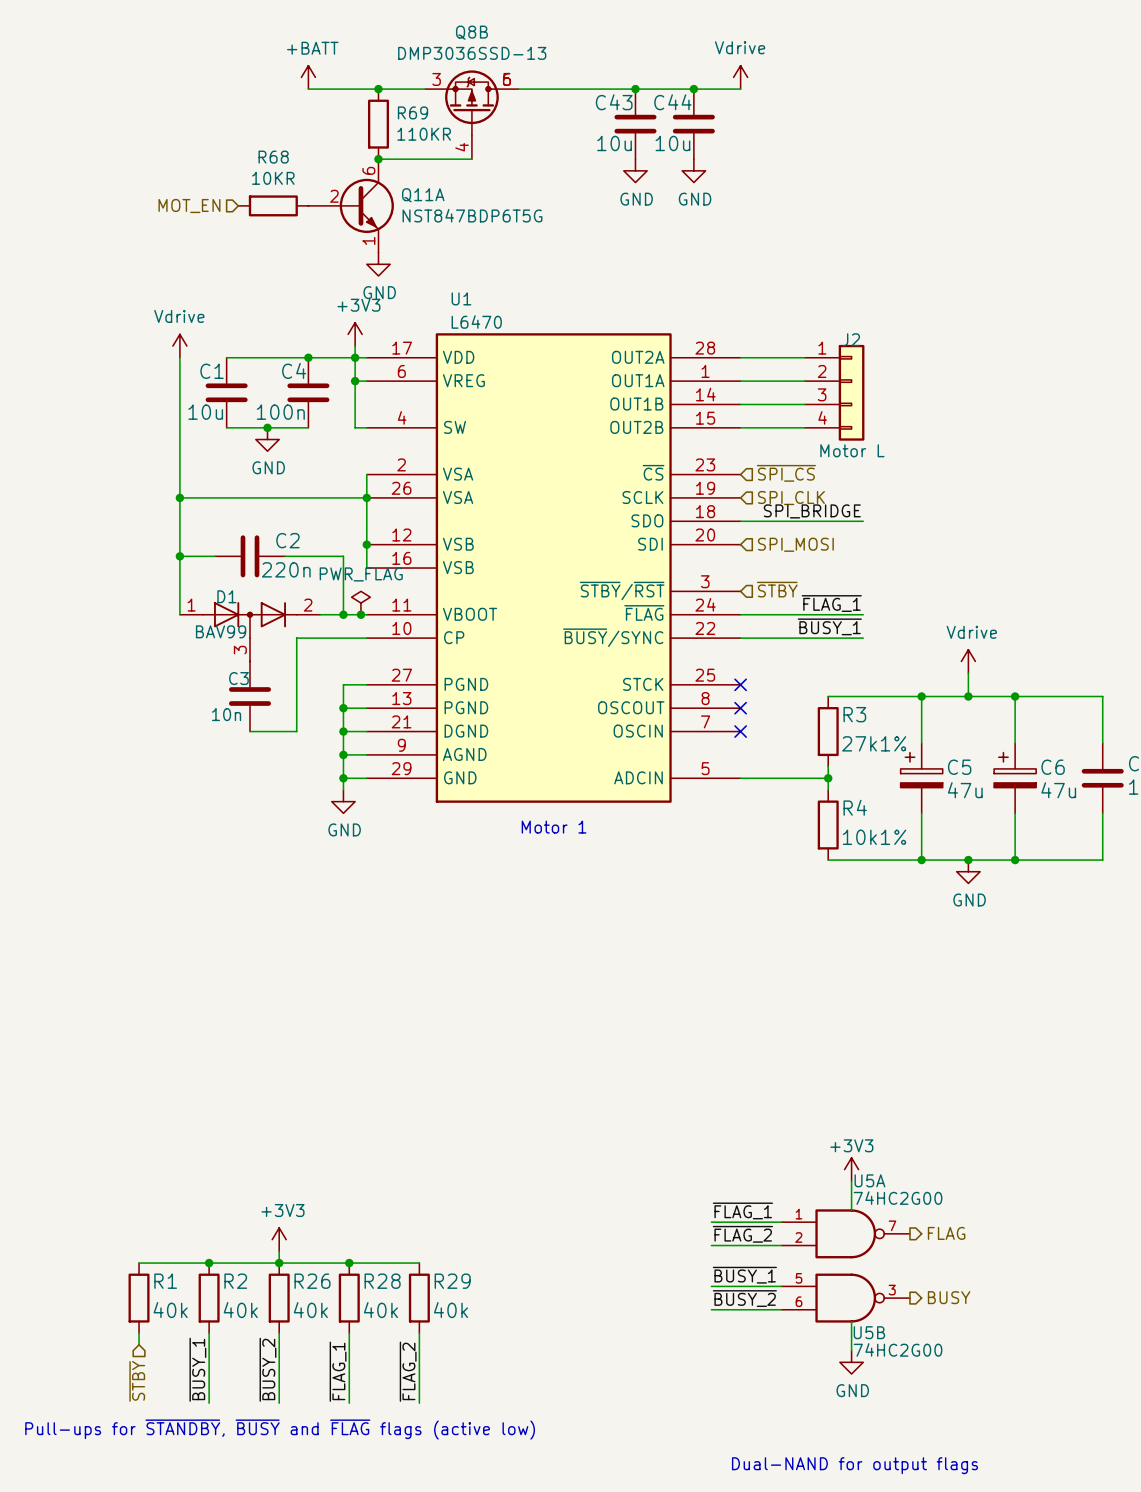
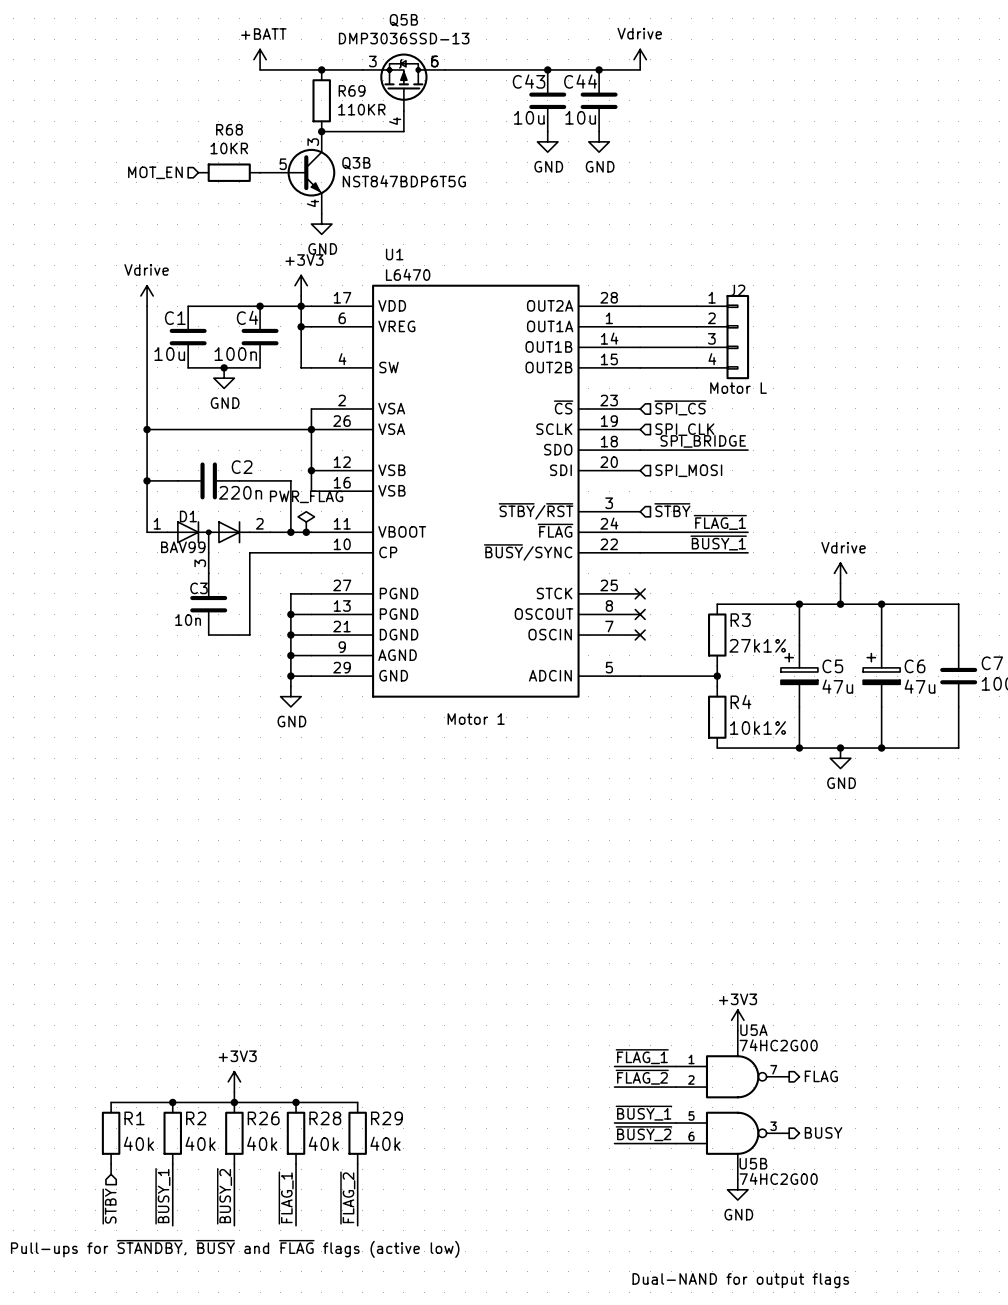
Q8B name: Q8B (471, 32) -> Q5B (403, 20)
Q11A pin number: 6 (368, 170) -> 3 (313, 142)
Q11A name: Q11A (423, 195) -> Q3B (356, 163)
Q11A pin number: 2 (334, 196) -> 5 (283, 164)
Q11A pin number: 1 (368, 240) -> 4 (312, 203)

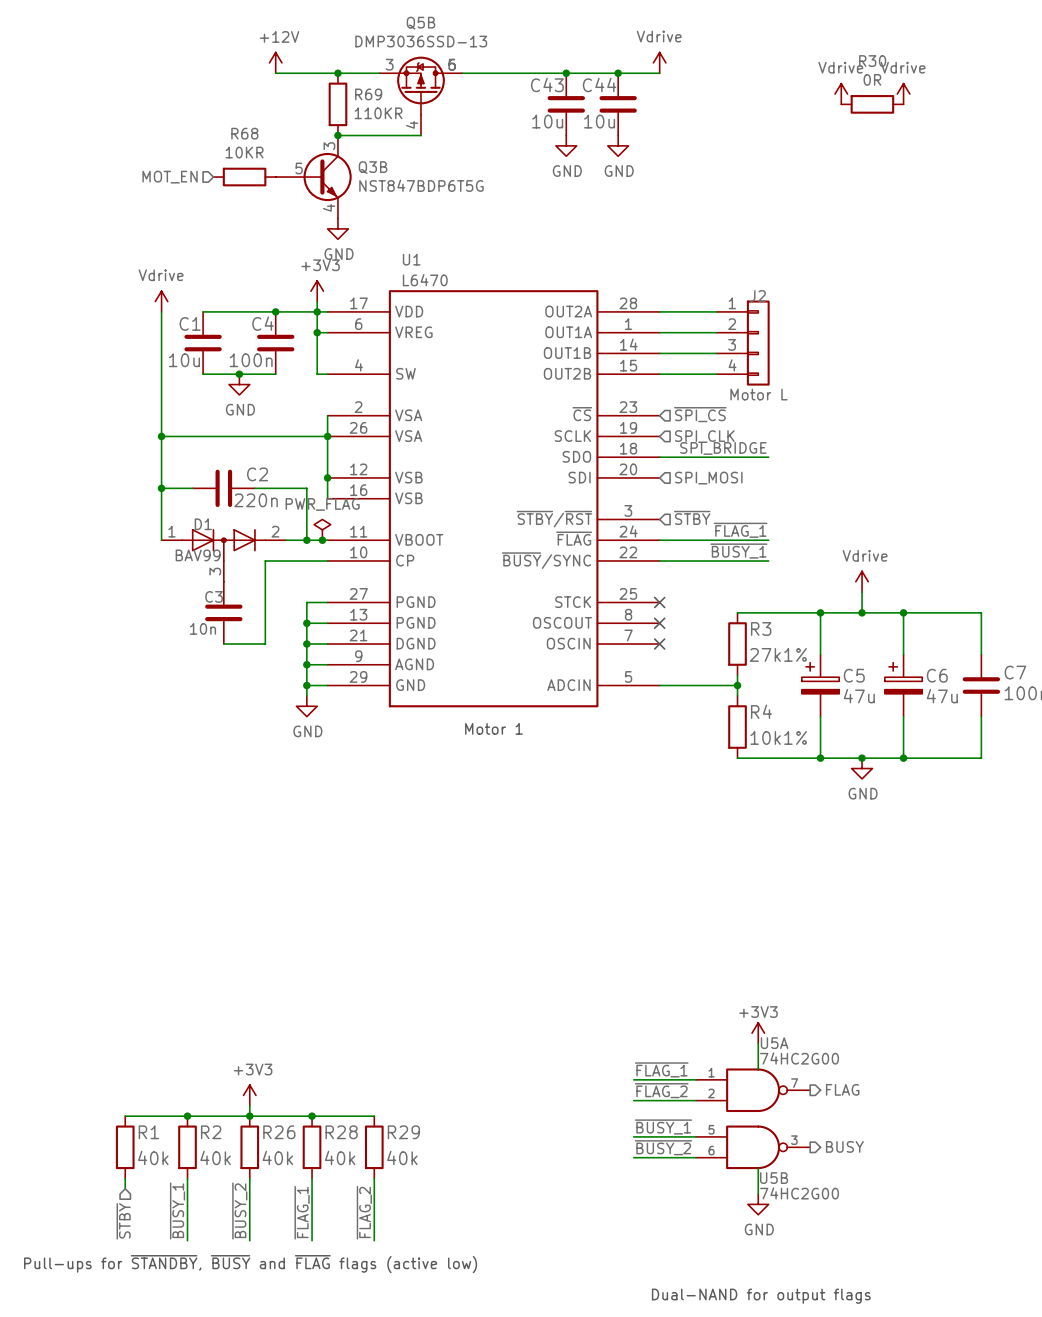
power symbol: +BATT (260, 59) -> +12V (275, 62)
power symbol: none -> Vdrive (841, 94)
power symbol: none -> Vdrive (903, 94)
R30: none -> 0R (872, 104)

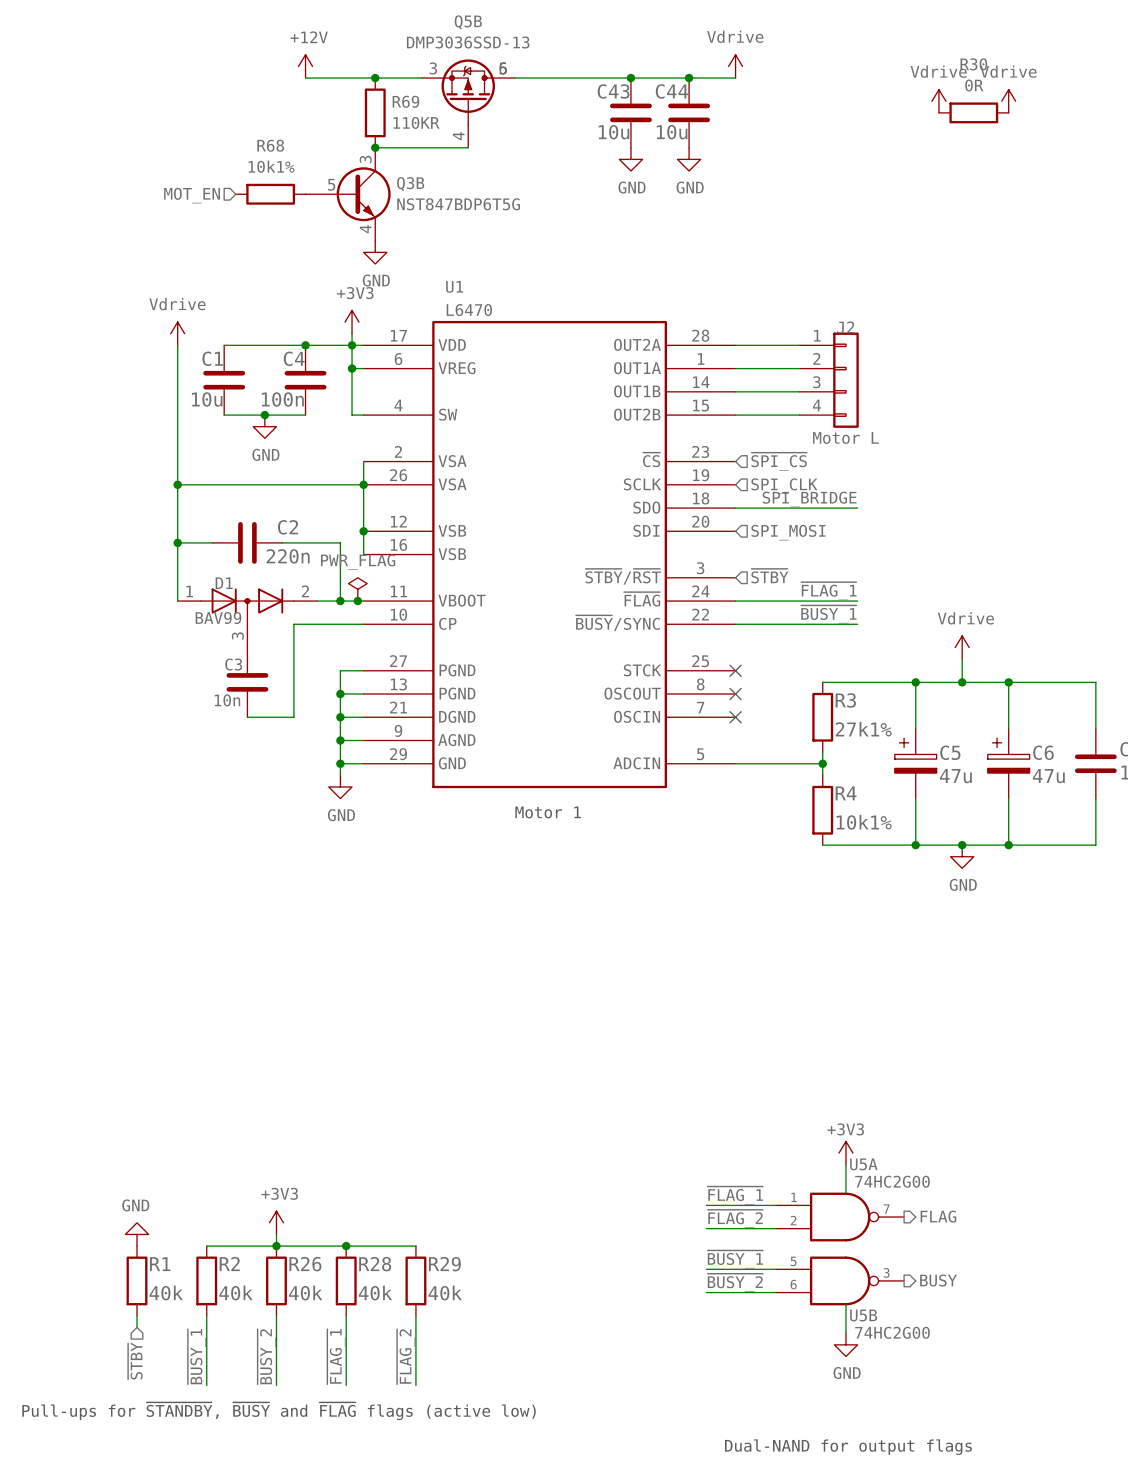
R68 value: 10KR (244, 152) -> 10k1% (271, 166)
power symbol: none -> GND (137, 1234)
wire: (125, 1116) (187, 1116) -> none
junction: (187, 1116) -> none

